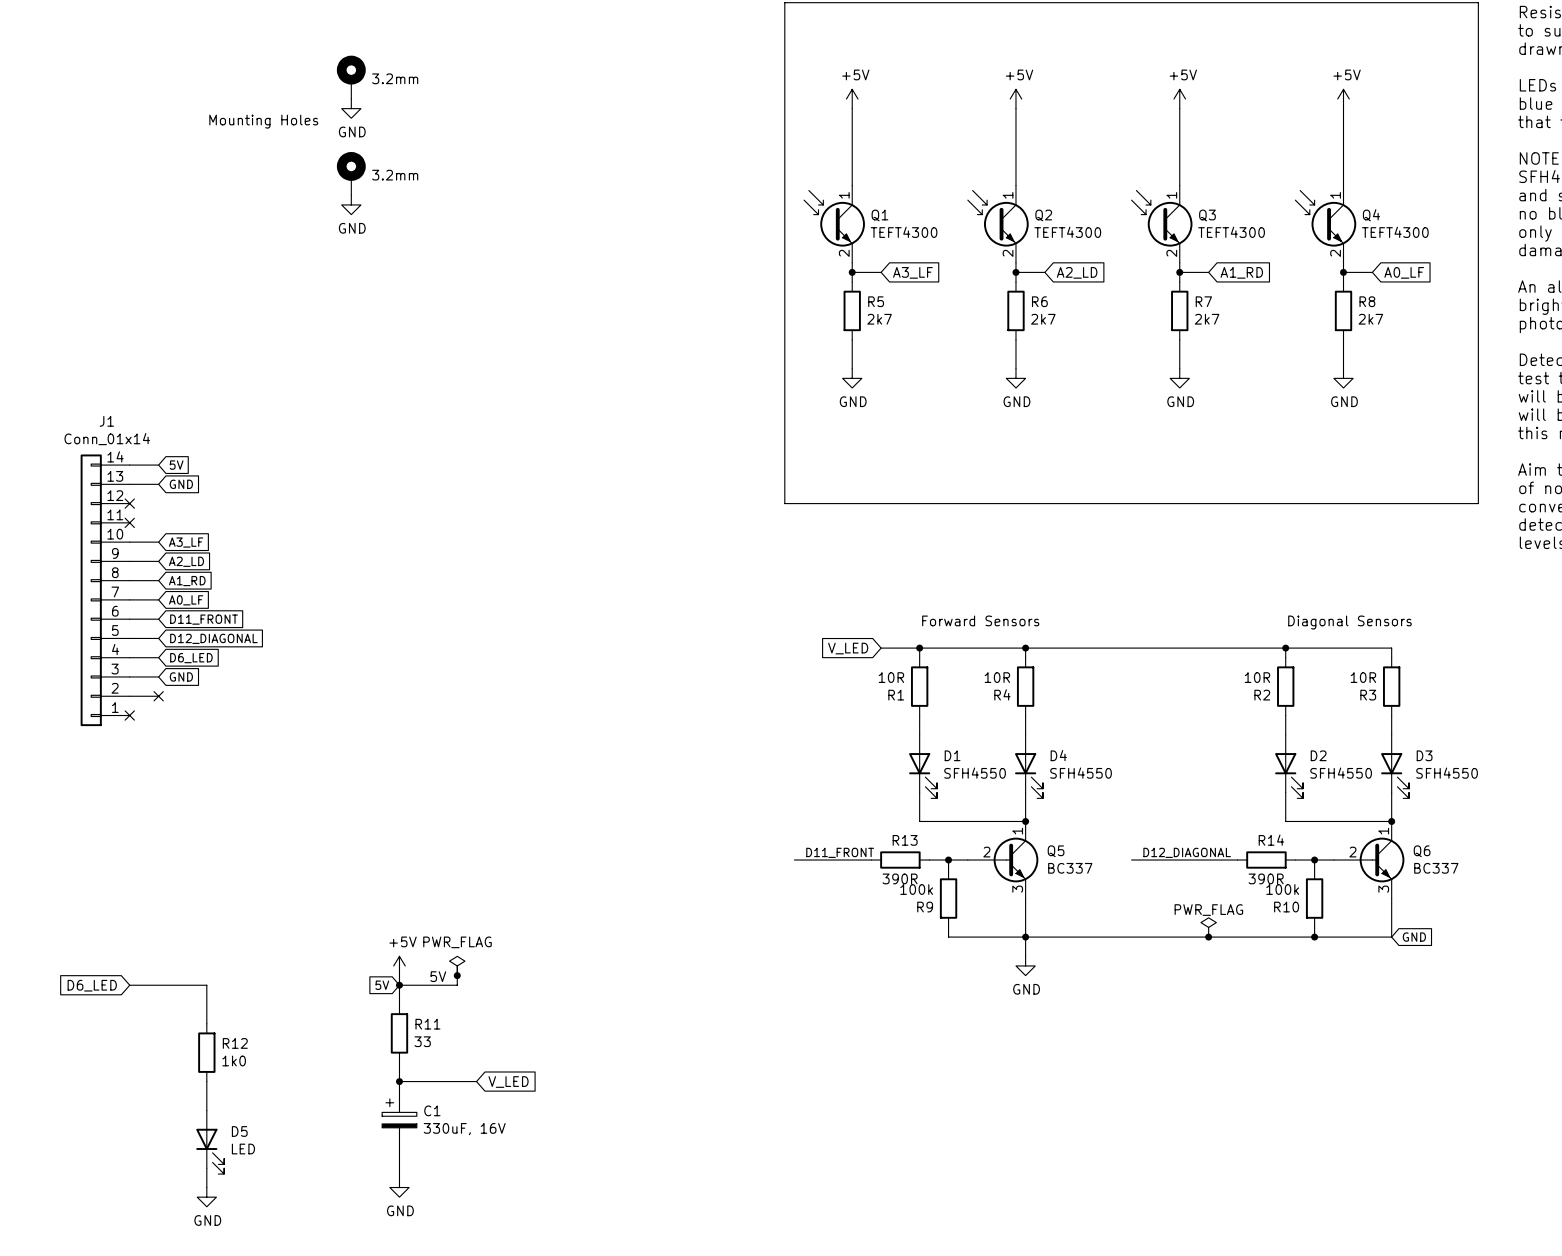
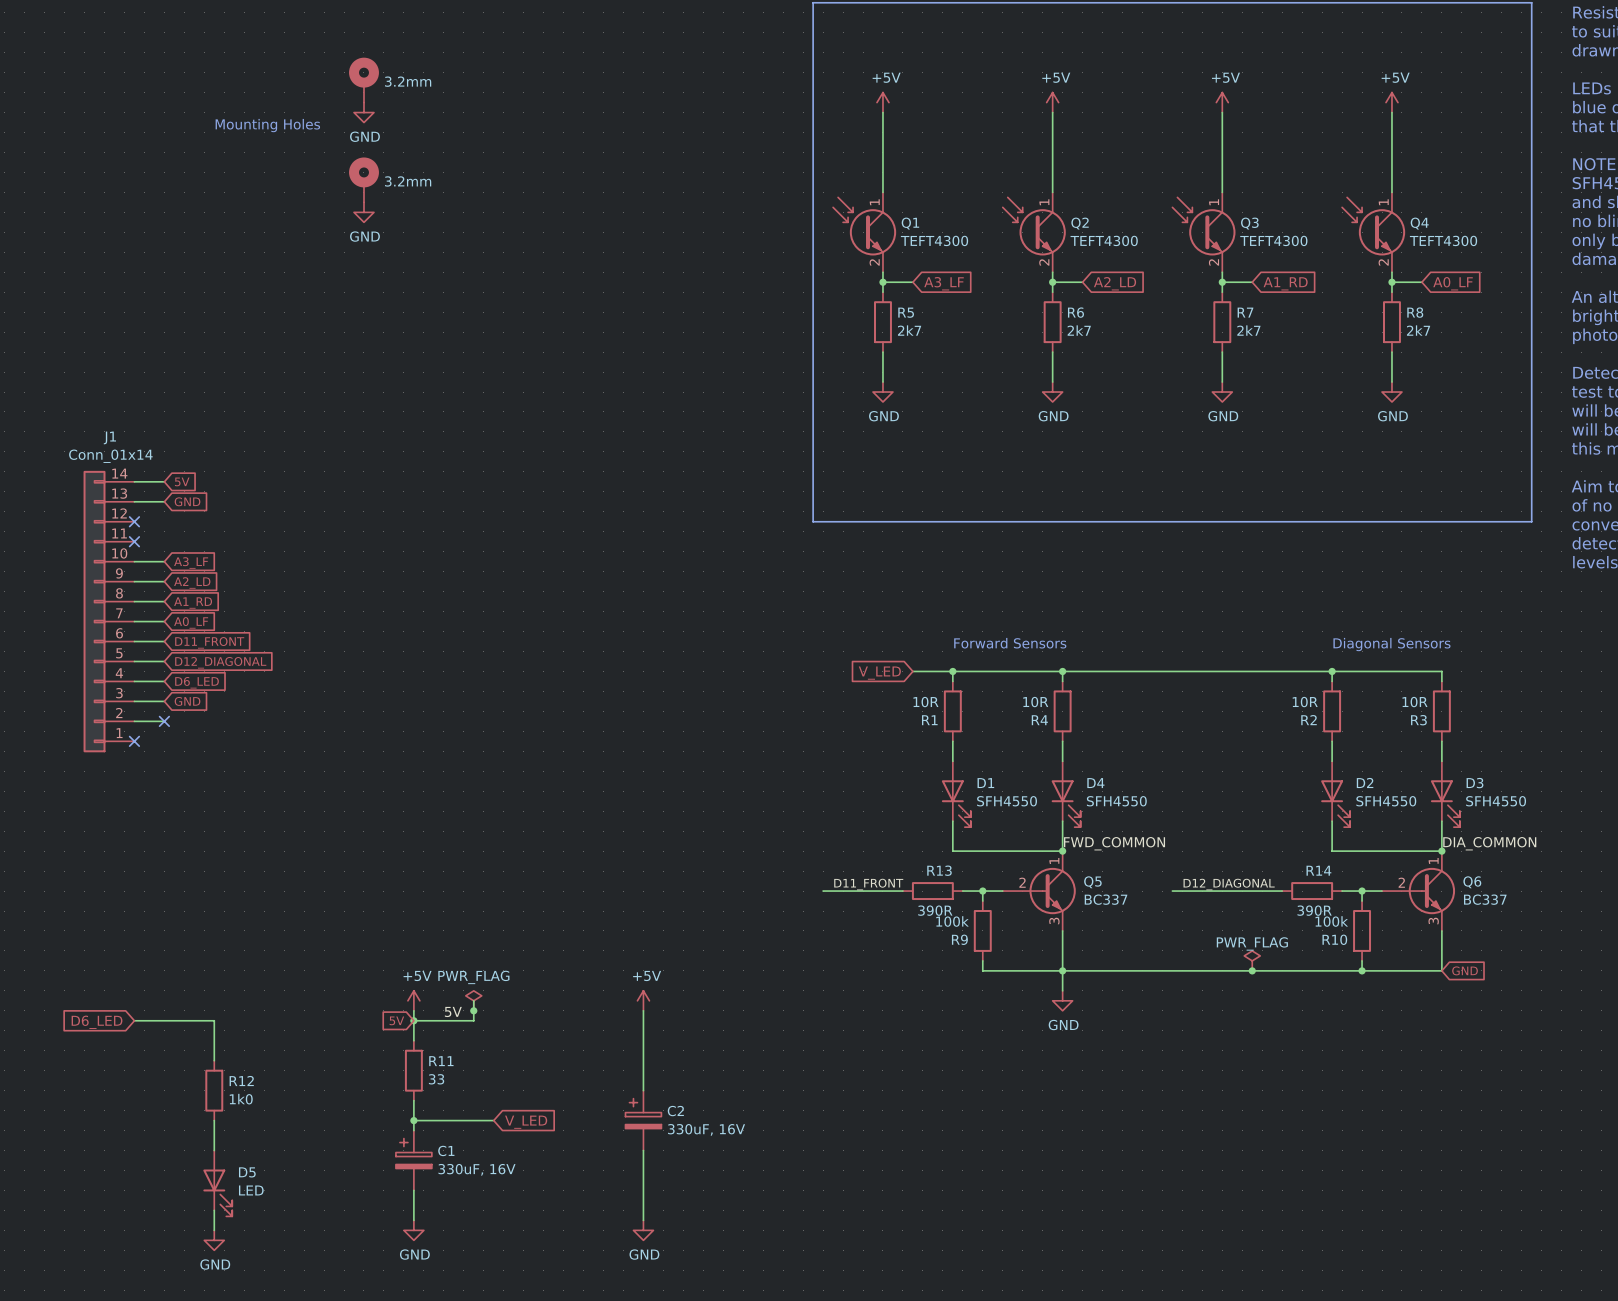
label: none -> FWD_COMMON (1114, 843)
label: none -> DIA_COMMON (1489, 843)
power symbol: none -> +5V (643, 1000)
wire: none -> (643, 1010) (643, 1090)
C2: none -> 330uF, 16V (643, 1120)
wire: none -> (643, 1150) (643, 1220)
power symbol: none -> GND (643, 1230)

